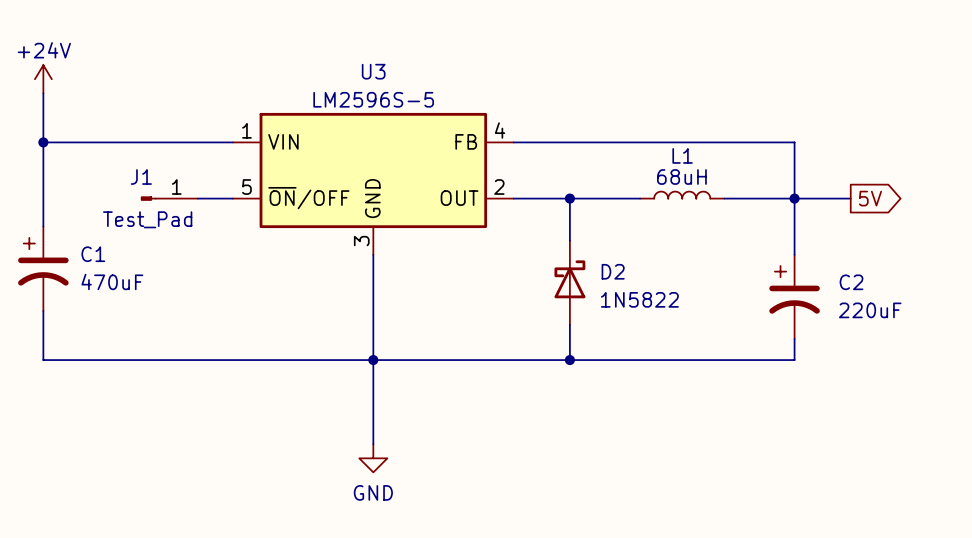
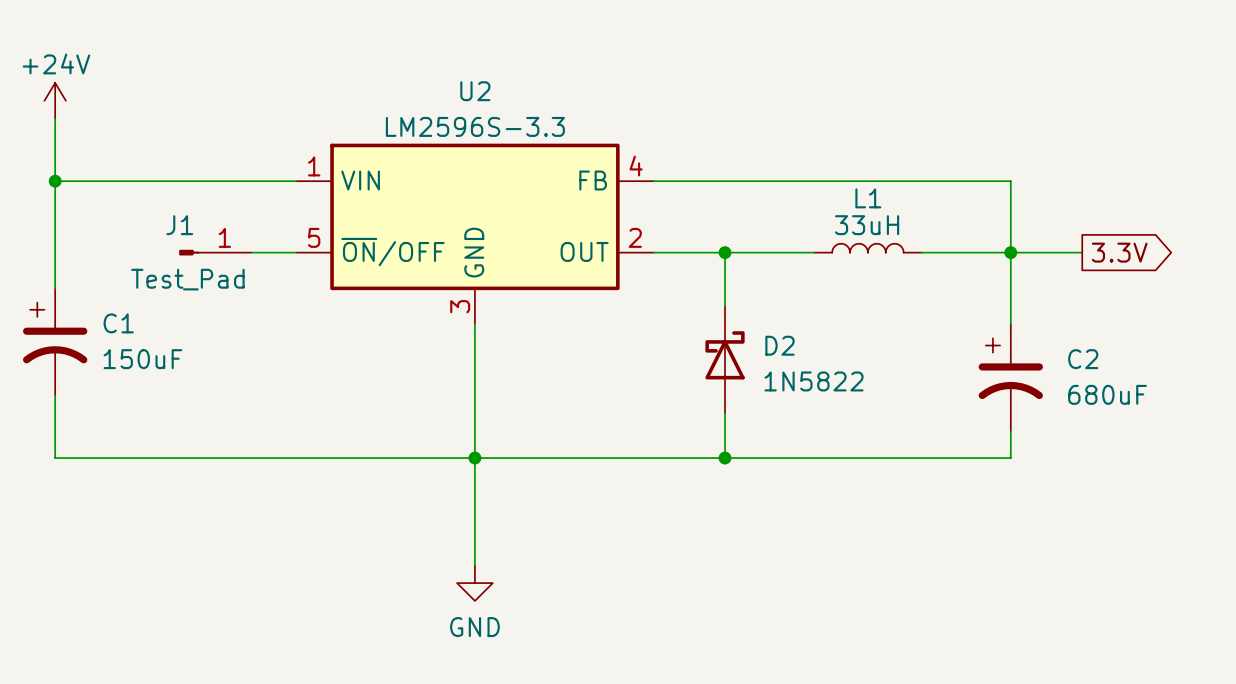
U3 name: U3 (373, 71) -> U2 (475, 91)
U3 value: LM2596S-5 (373, 99) -> LM2596S-3.3 (475, 126)
L1 value: 68uH (681, 177) -> 33uH (867, 225)
global label: 5V (870, 198) -> 3.3V (1119, 252)
C1 value: 470uF (112, 281) -> 150uF (142, 359)
C2 value: 220uF (870, 310) -> 680uF (1107, 394)

